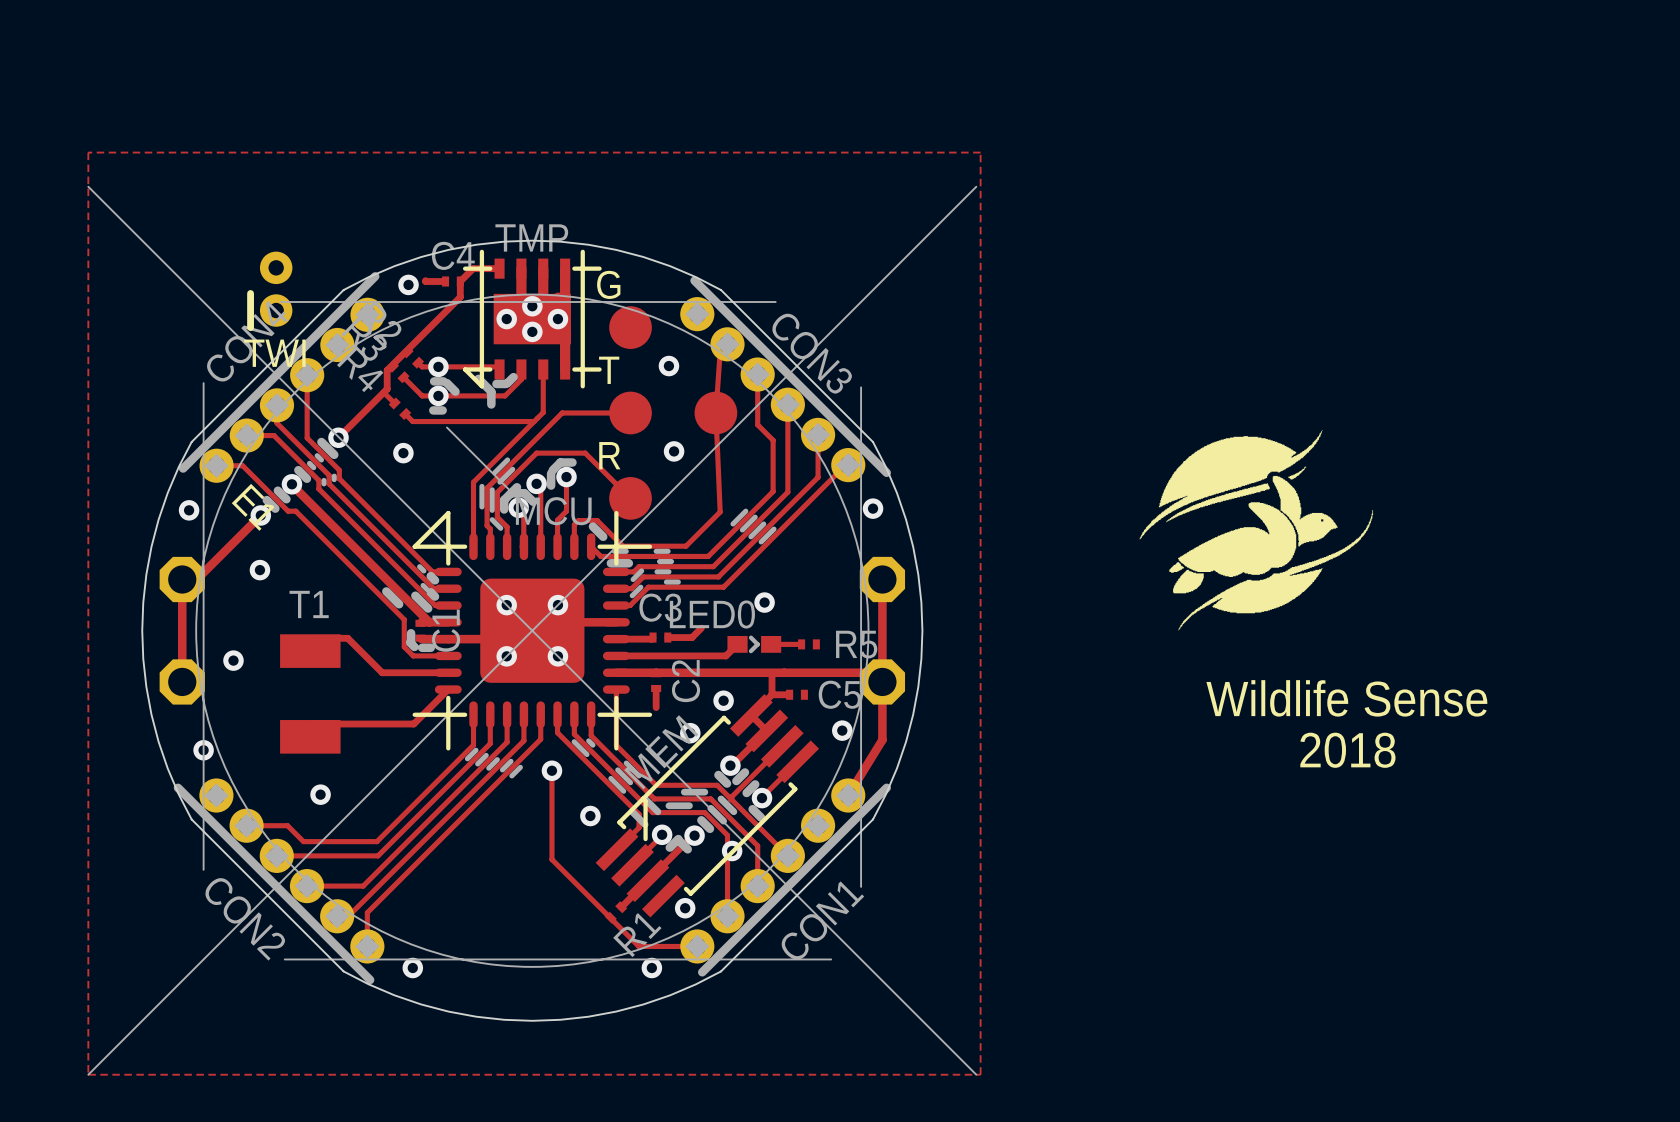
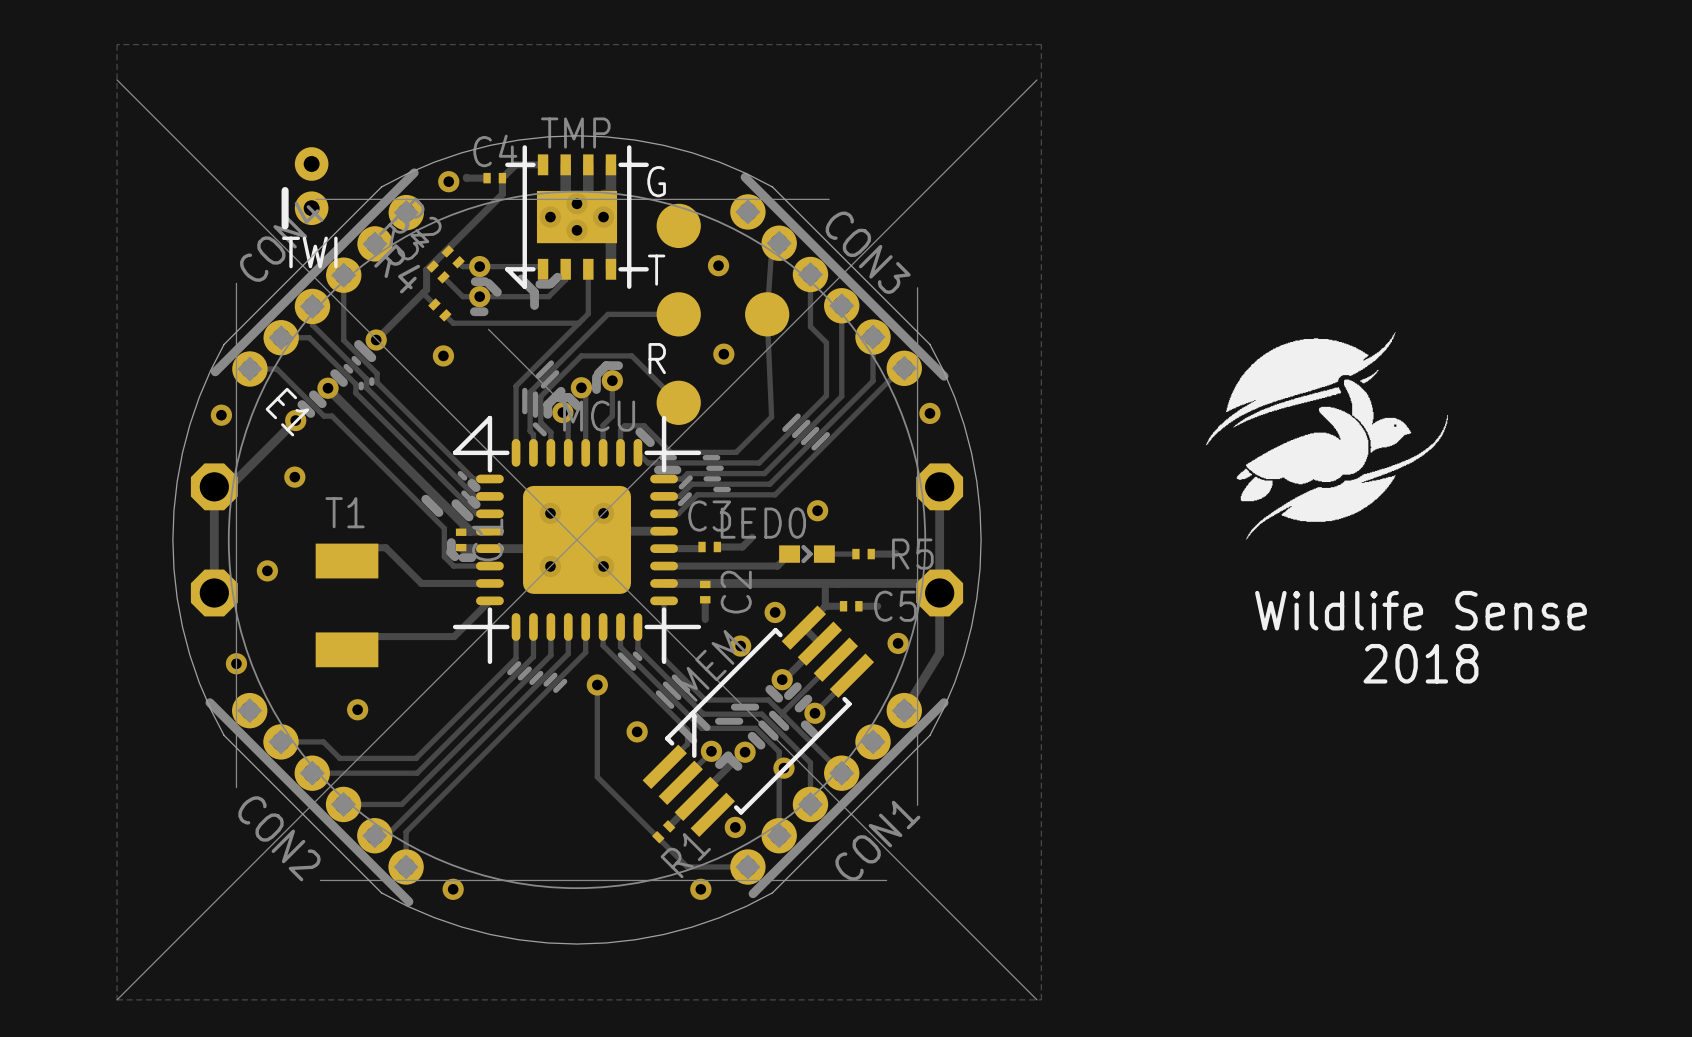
track: none -> (895, 553) (871, 554)
track: none -> (858, 606) (877, 606)

